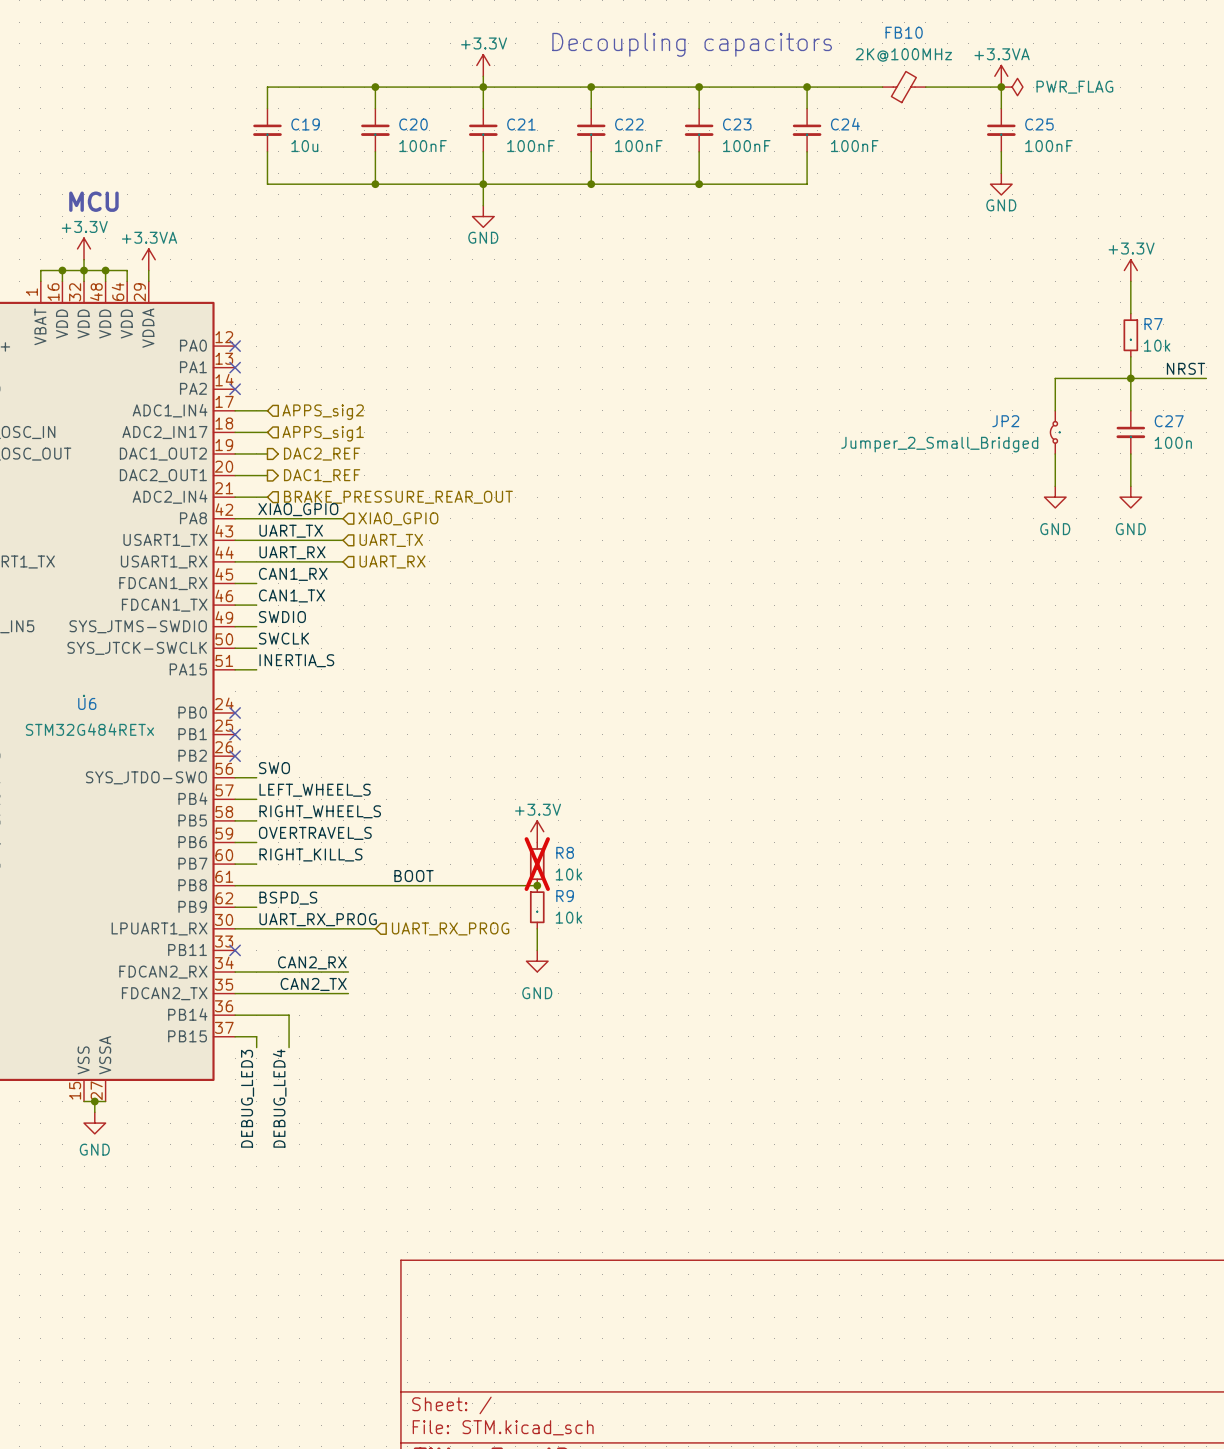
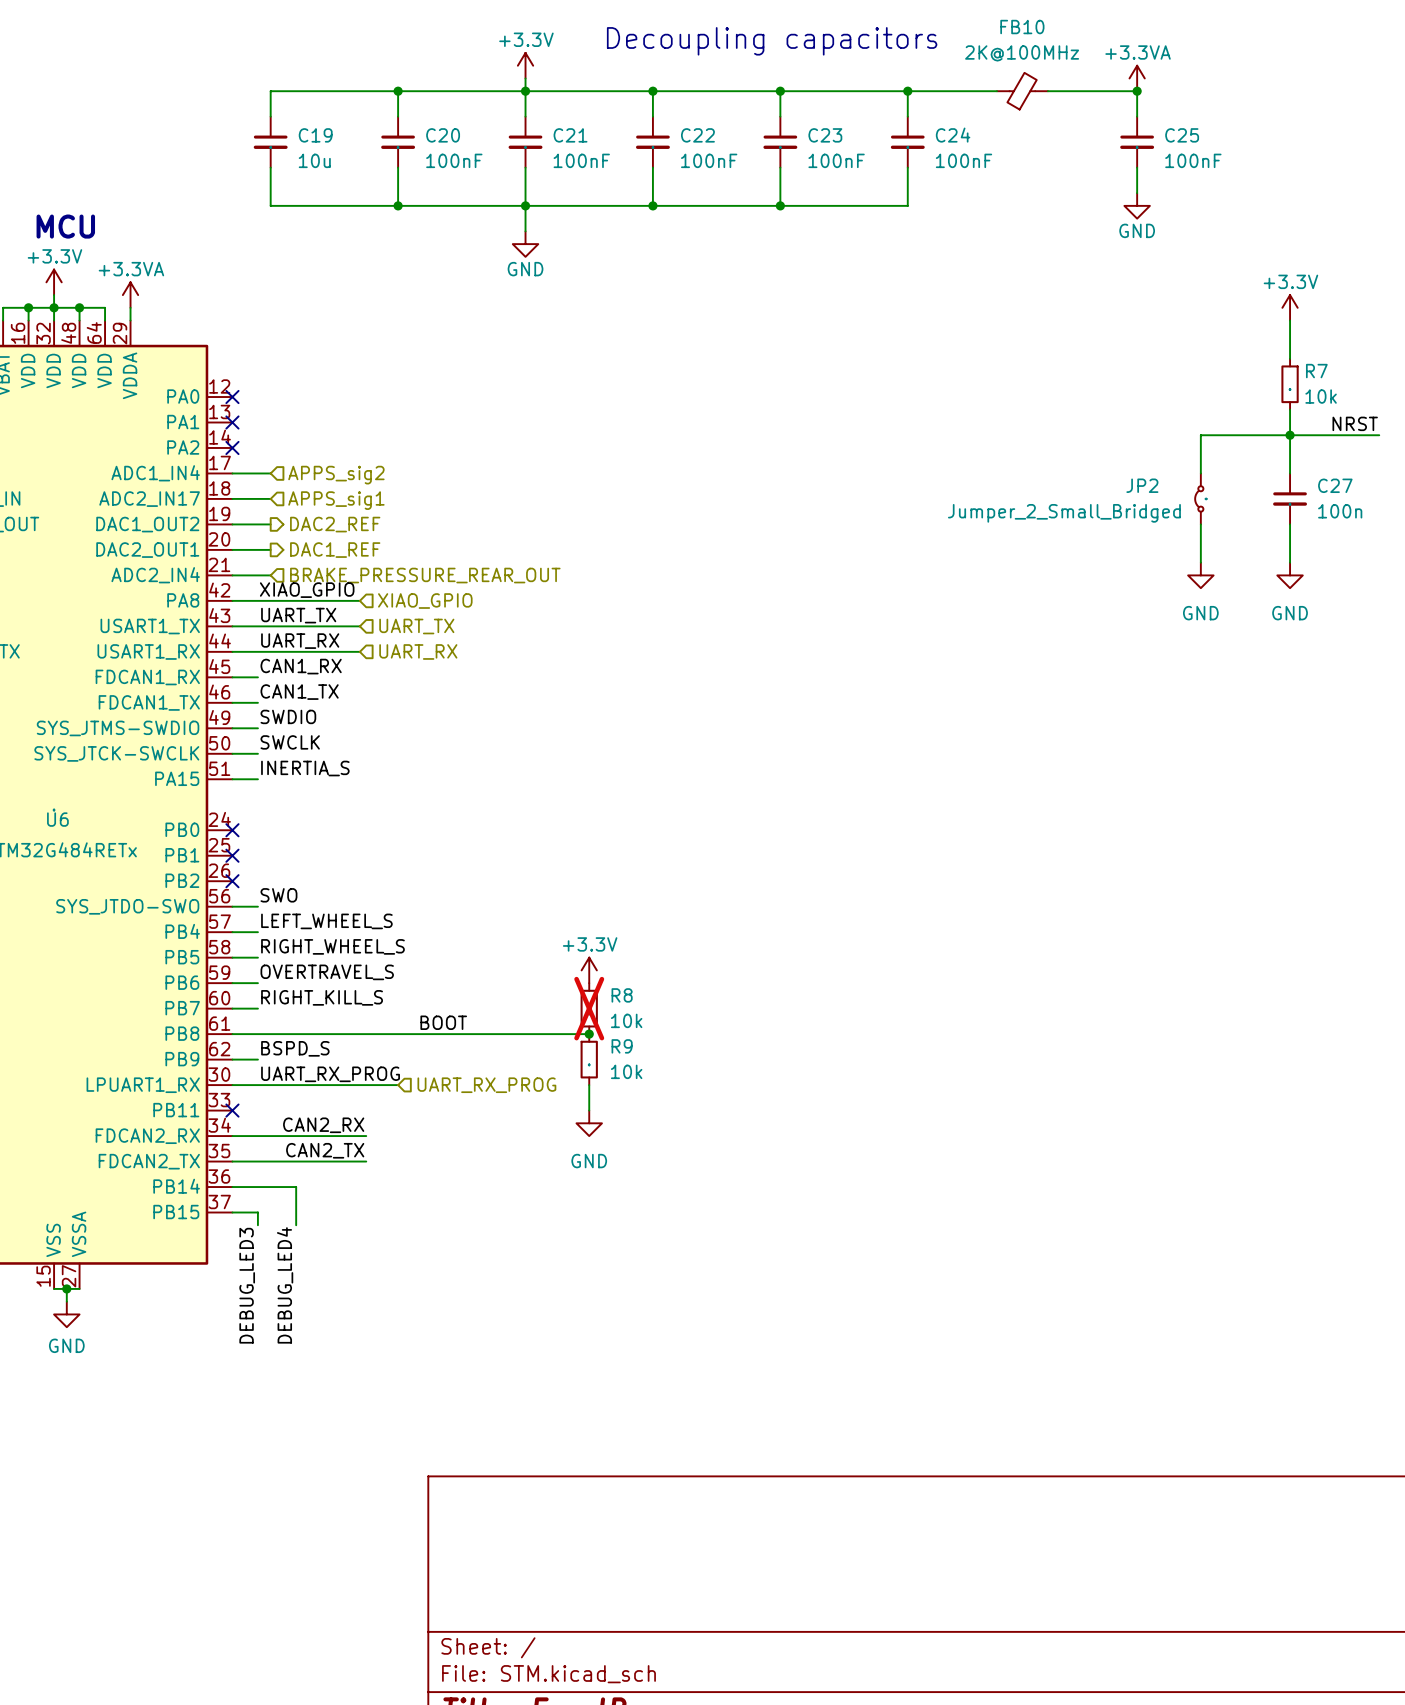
power symbol: PWR_FLAG (1012, 87) -> none

